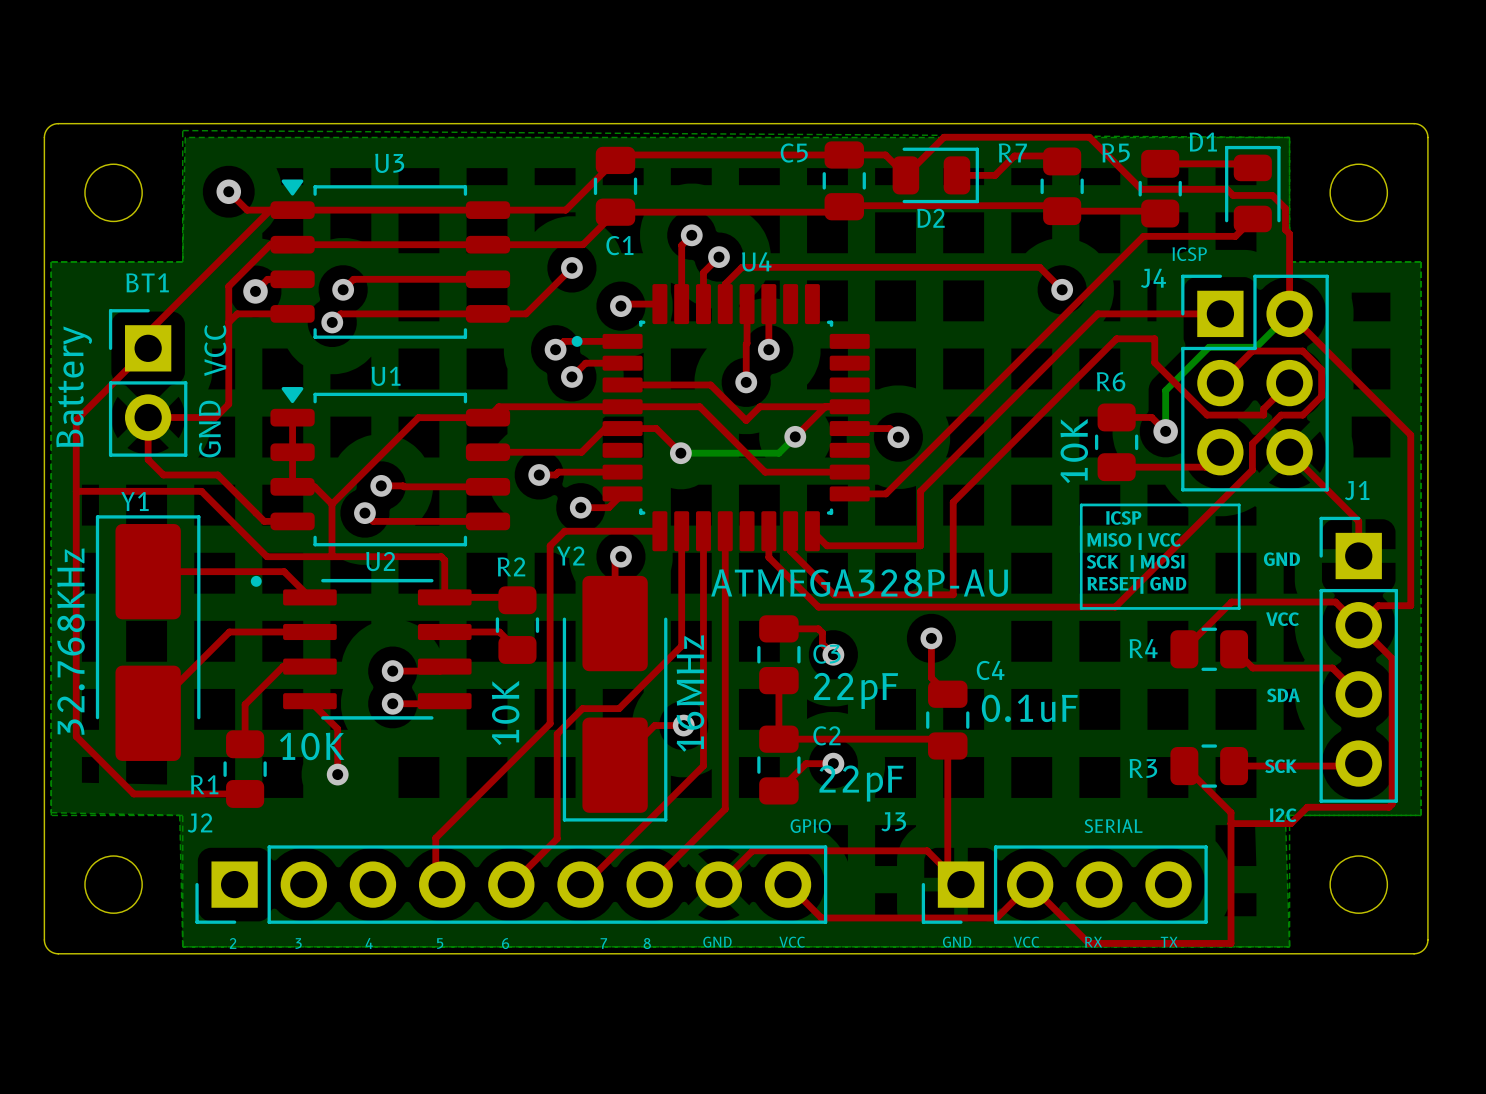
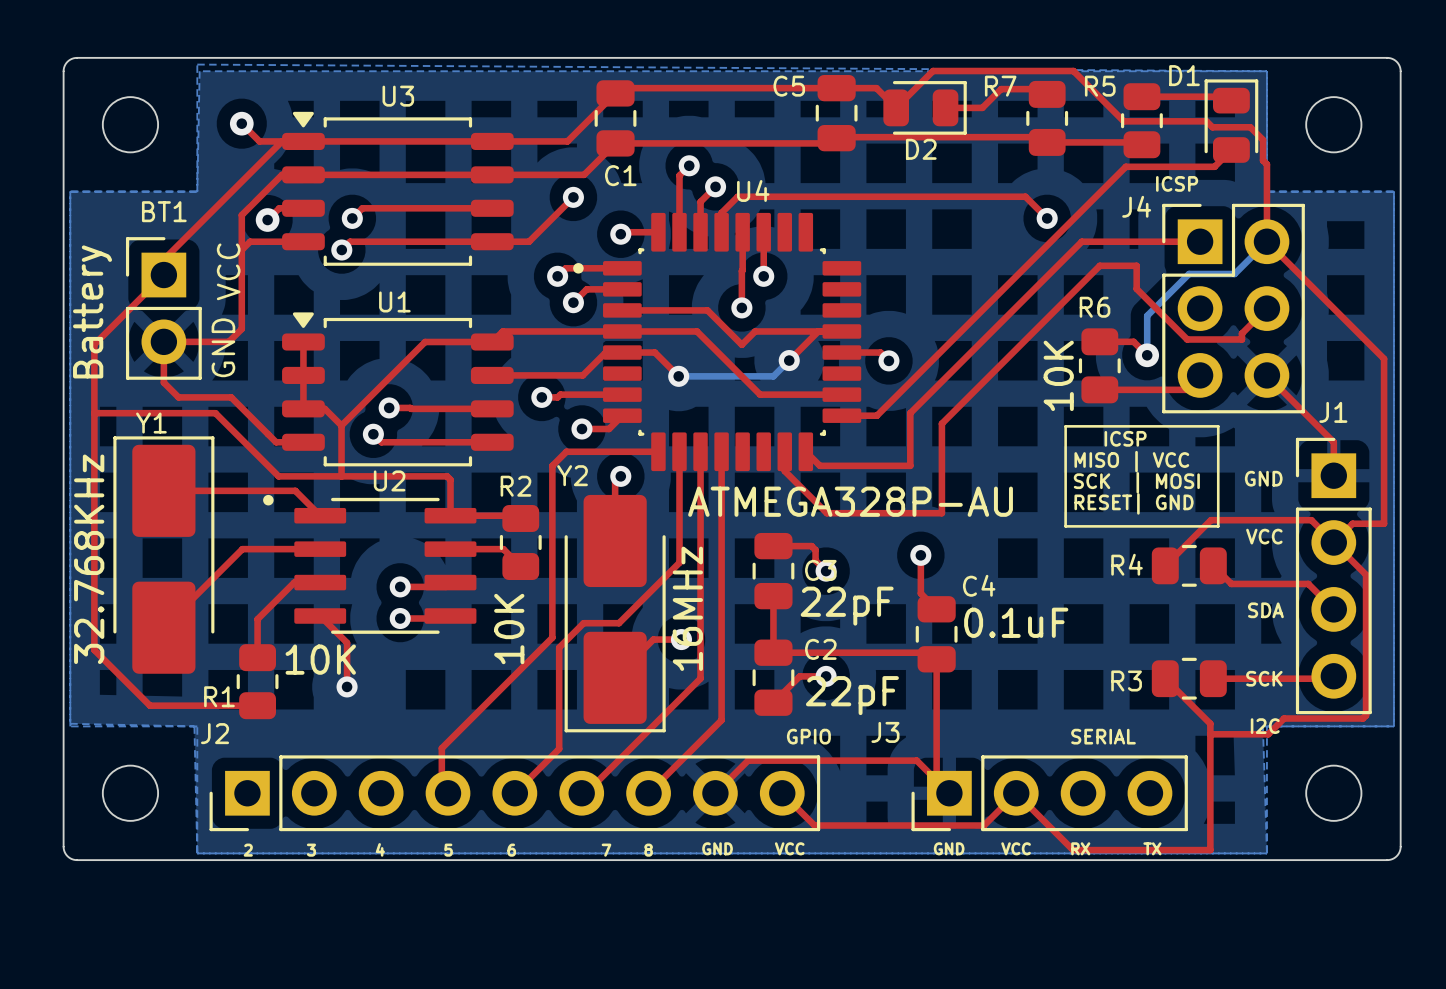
top track: (1220, 383) (1252, 351) (1302, 351) (1321, 369) (1321, 396) (1302, 415) (1281, 415) (1252, 443) (1252, 469) (1115, 607) (818, 607) (768, 557) (768, 531) -> none

